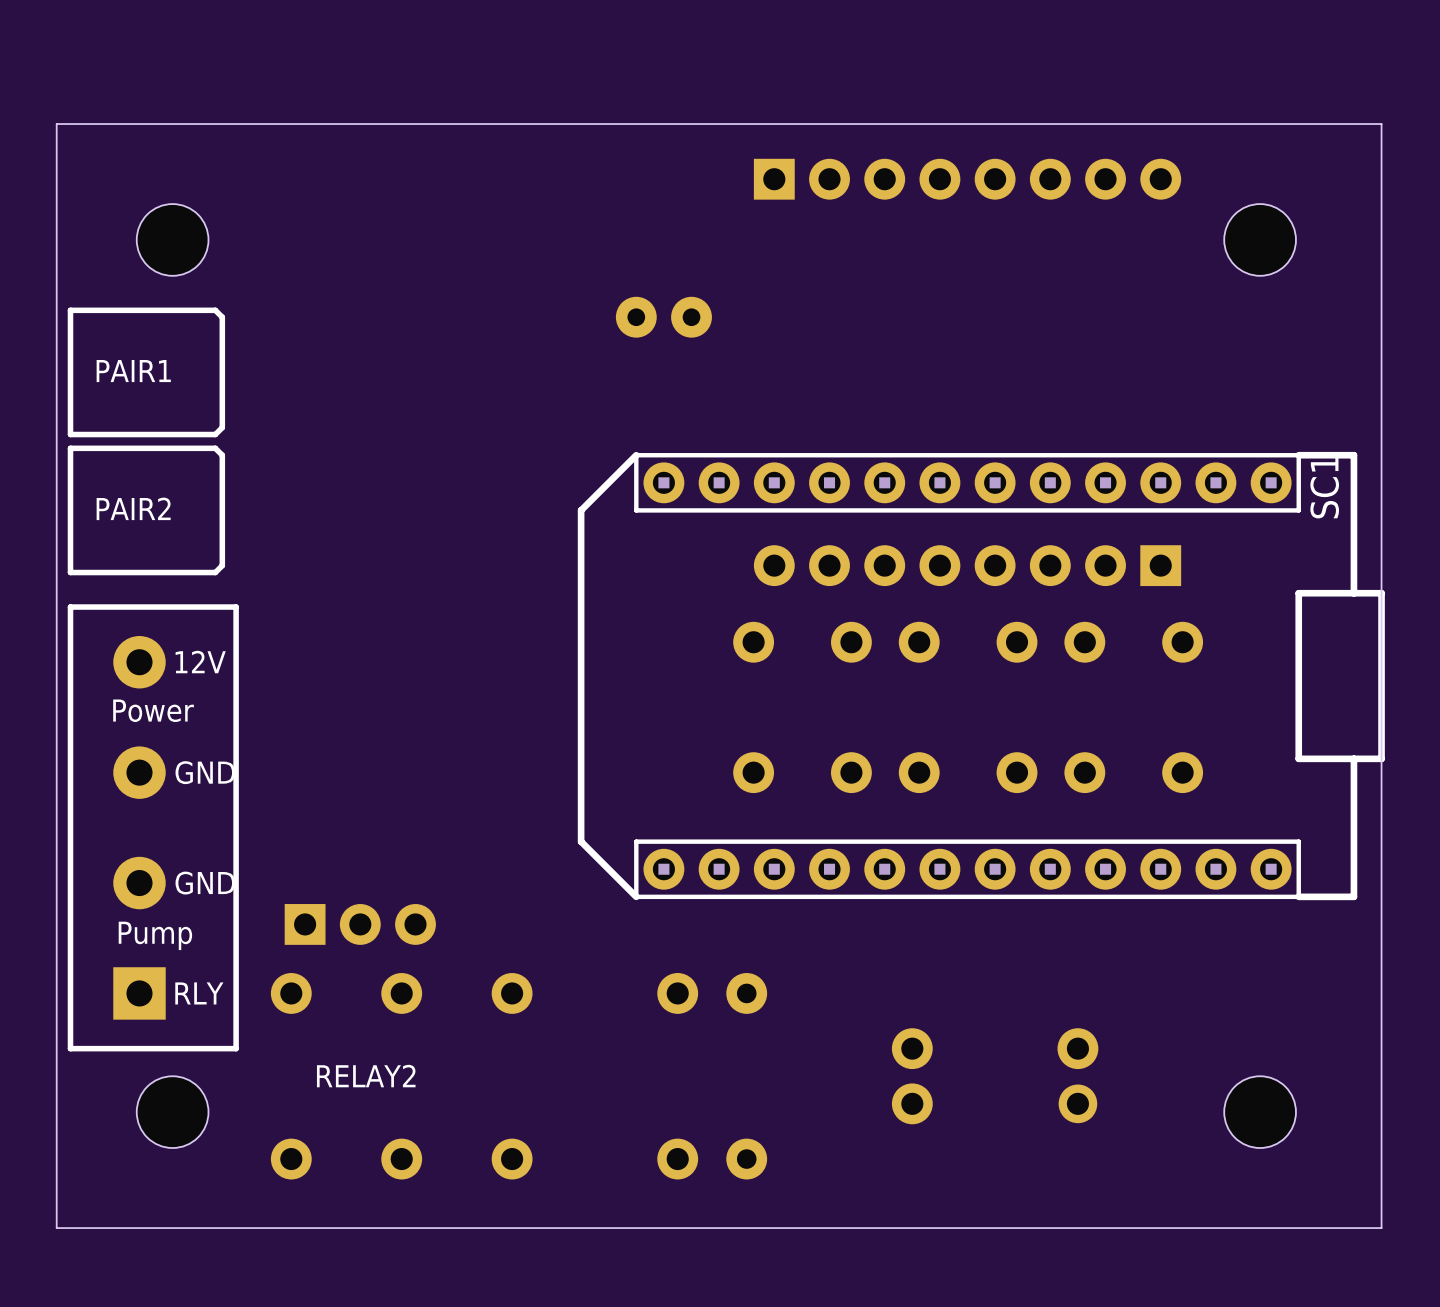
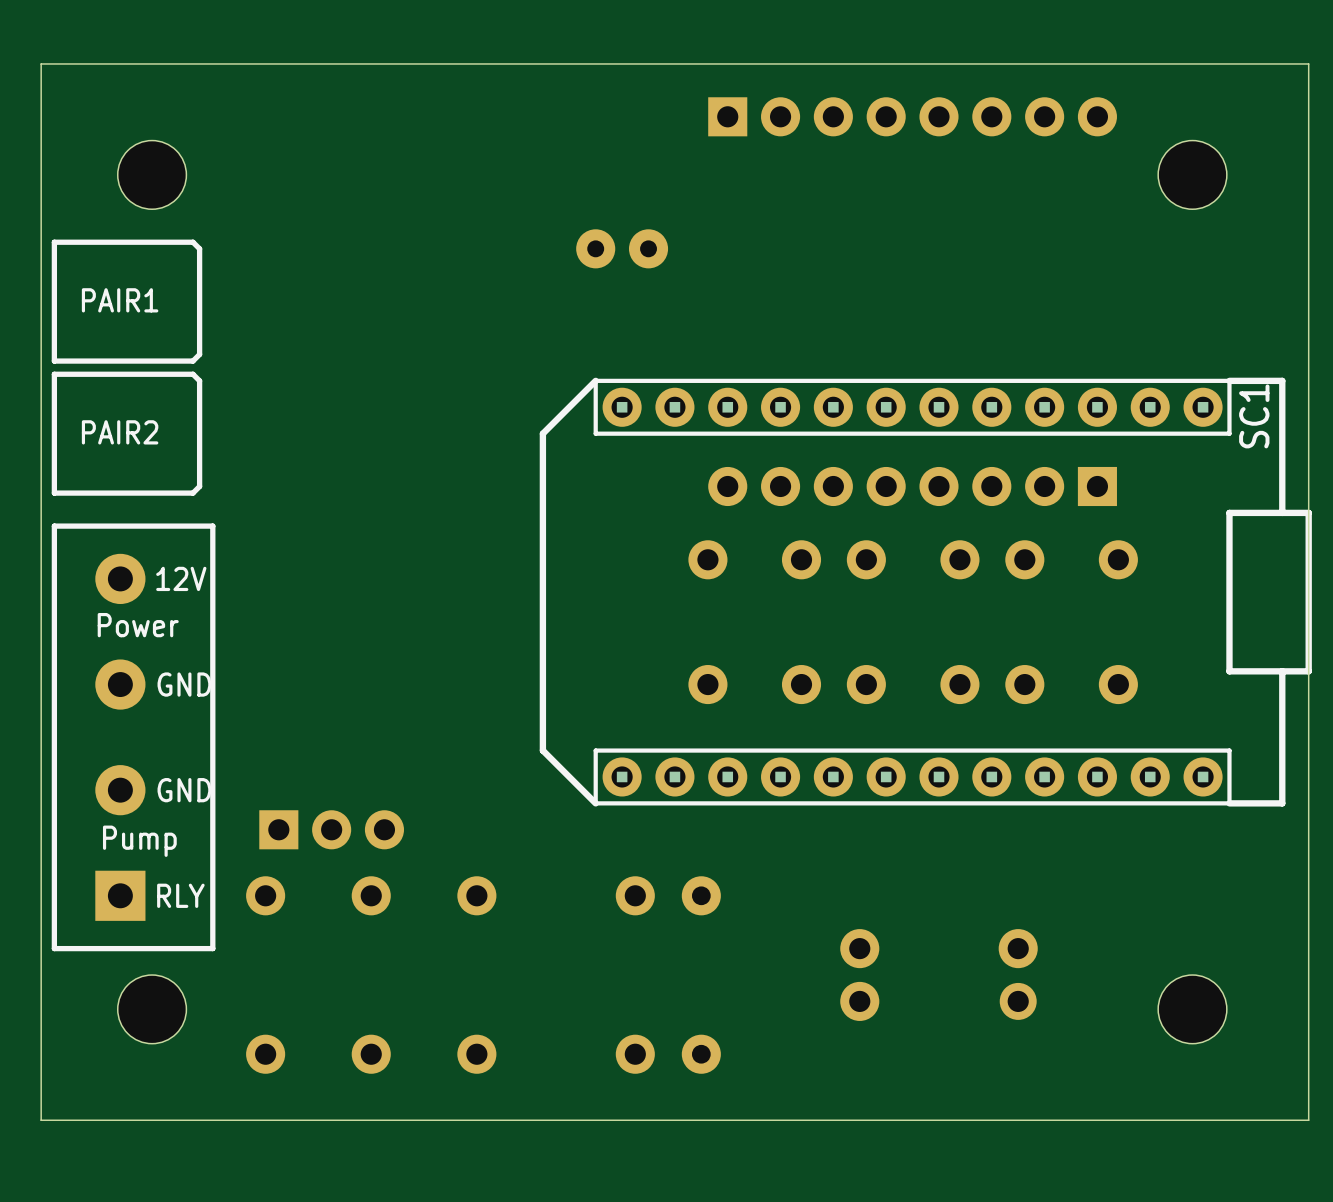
text: RELAY2 (366, 1076) -> none

